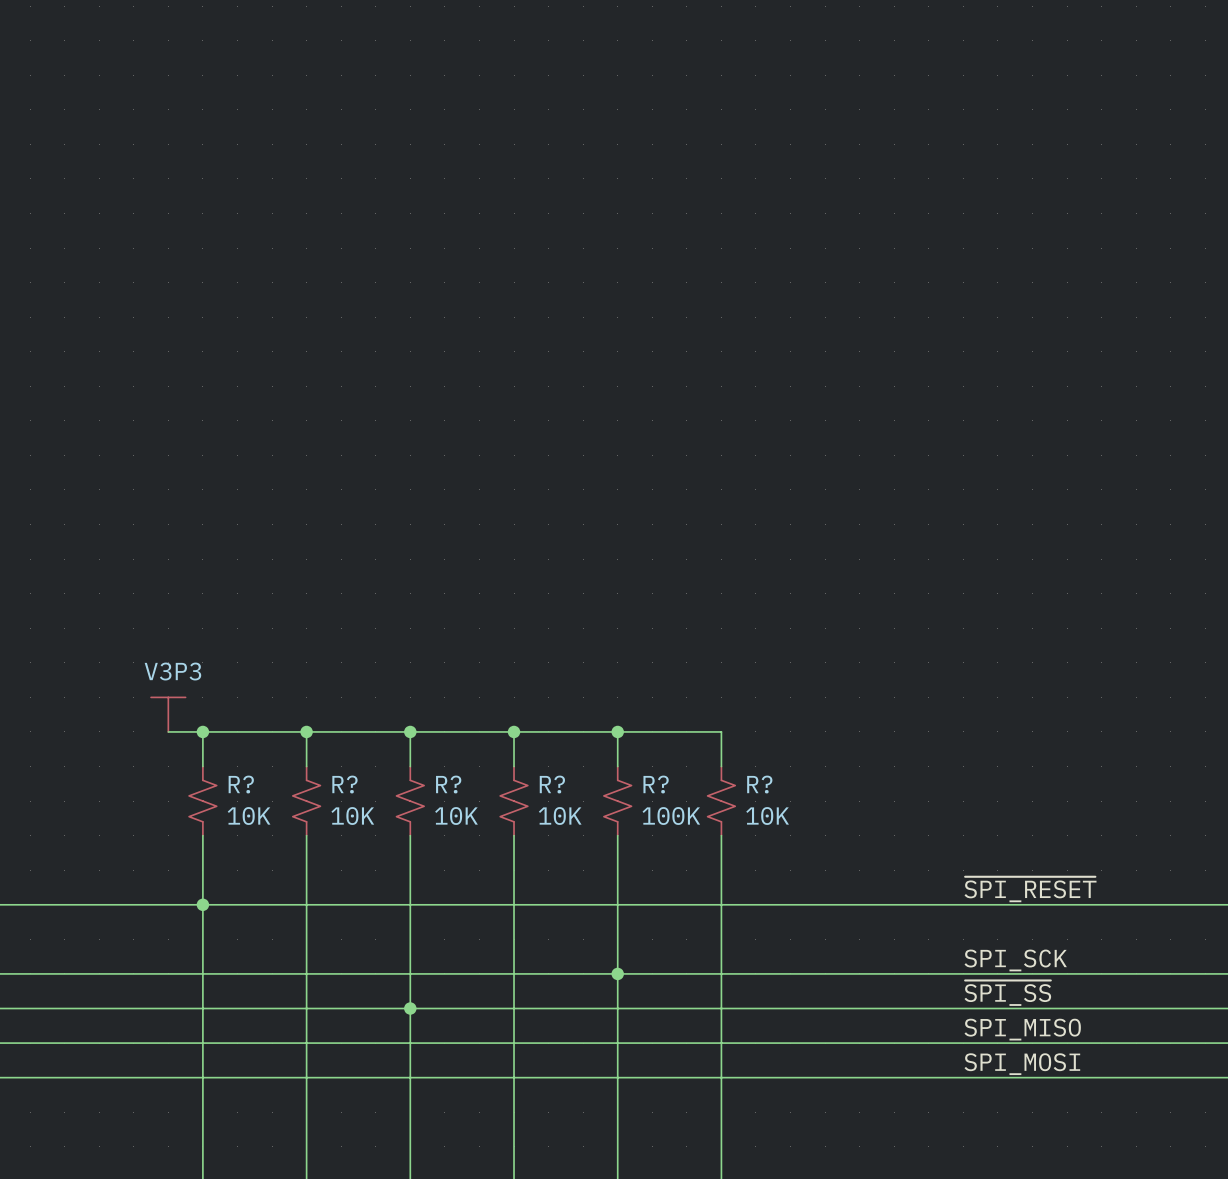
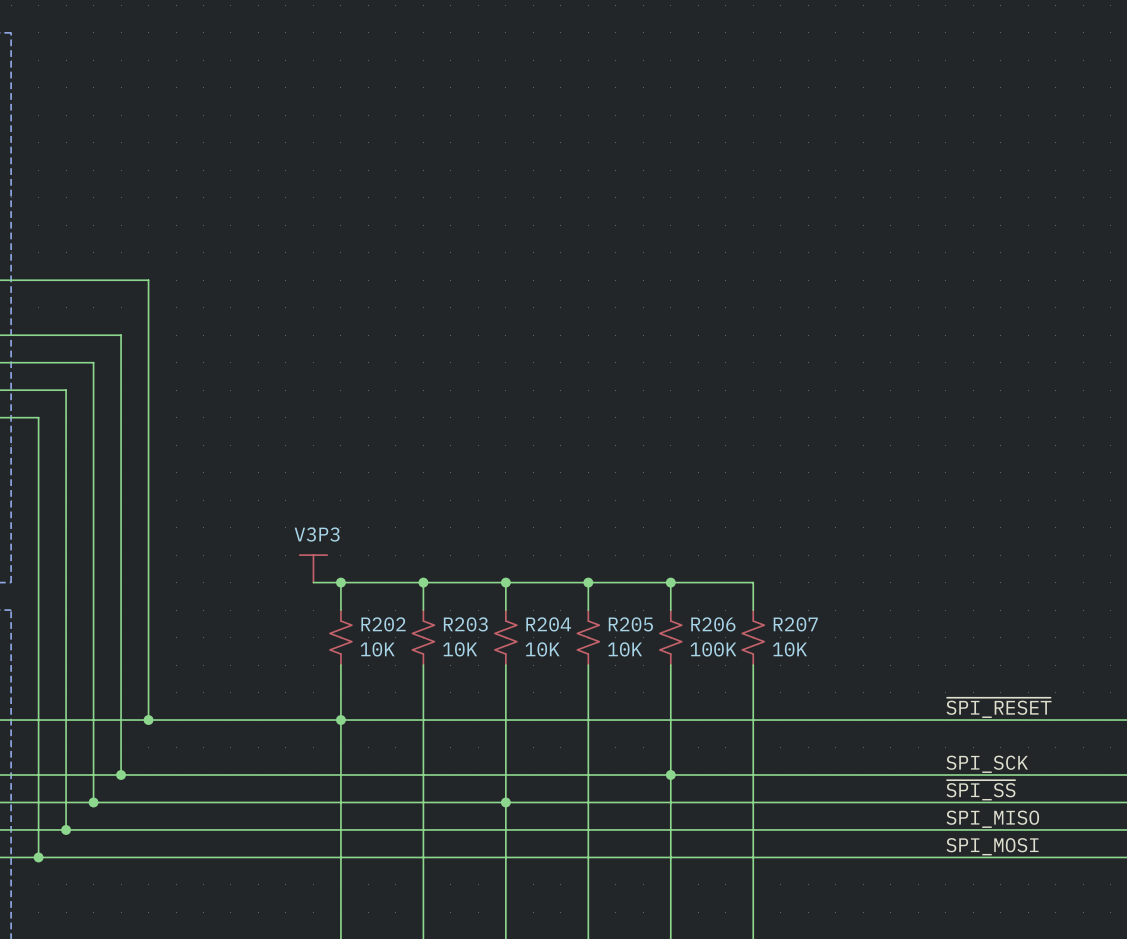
R? name: R? (241, 784) -> R202 (383, 624)
R? name: R? (344, 784) -> R203 (465, 624)
R? name: R? (448, 784) -> R204 (548, 624)
R? name: R? (552, 784) -> R205 (630, 624)
R? name: R? (656, 784) -> R206 (713, 624)
R? name: R? (759, 784) -> R207 (795, 624)

